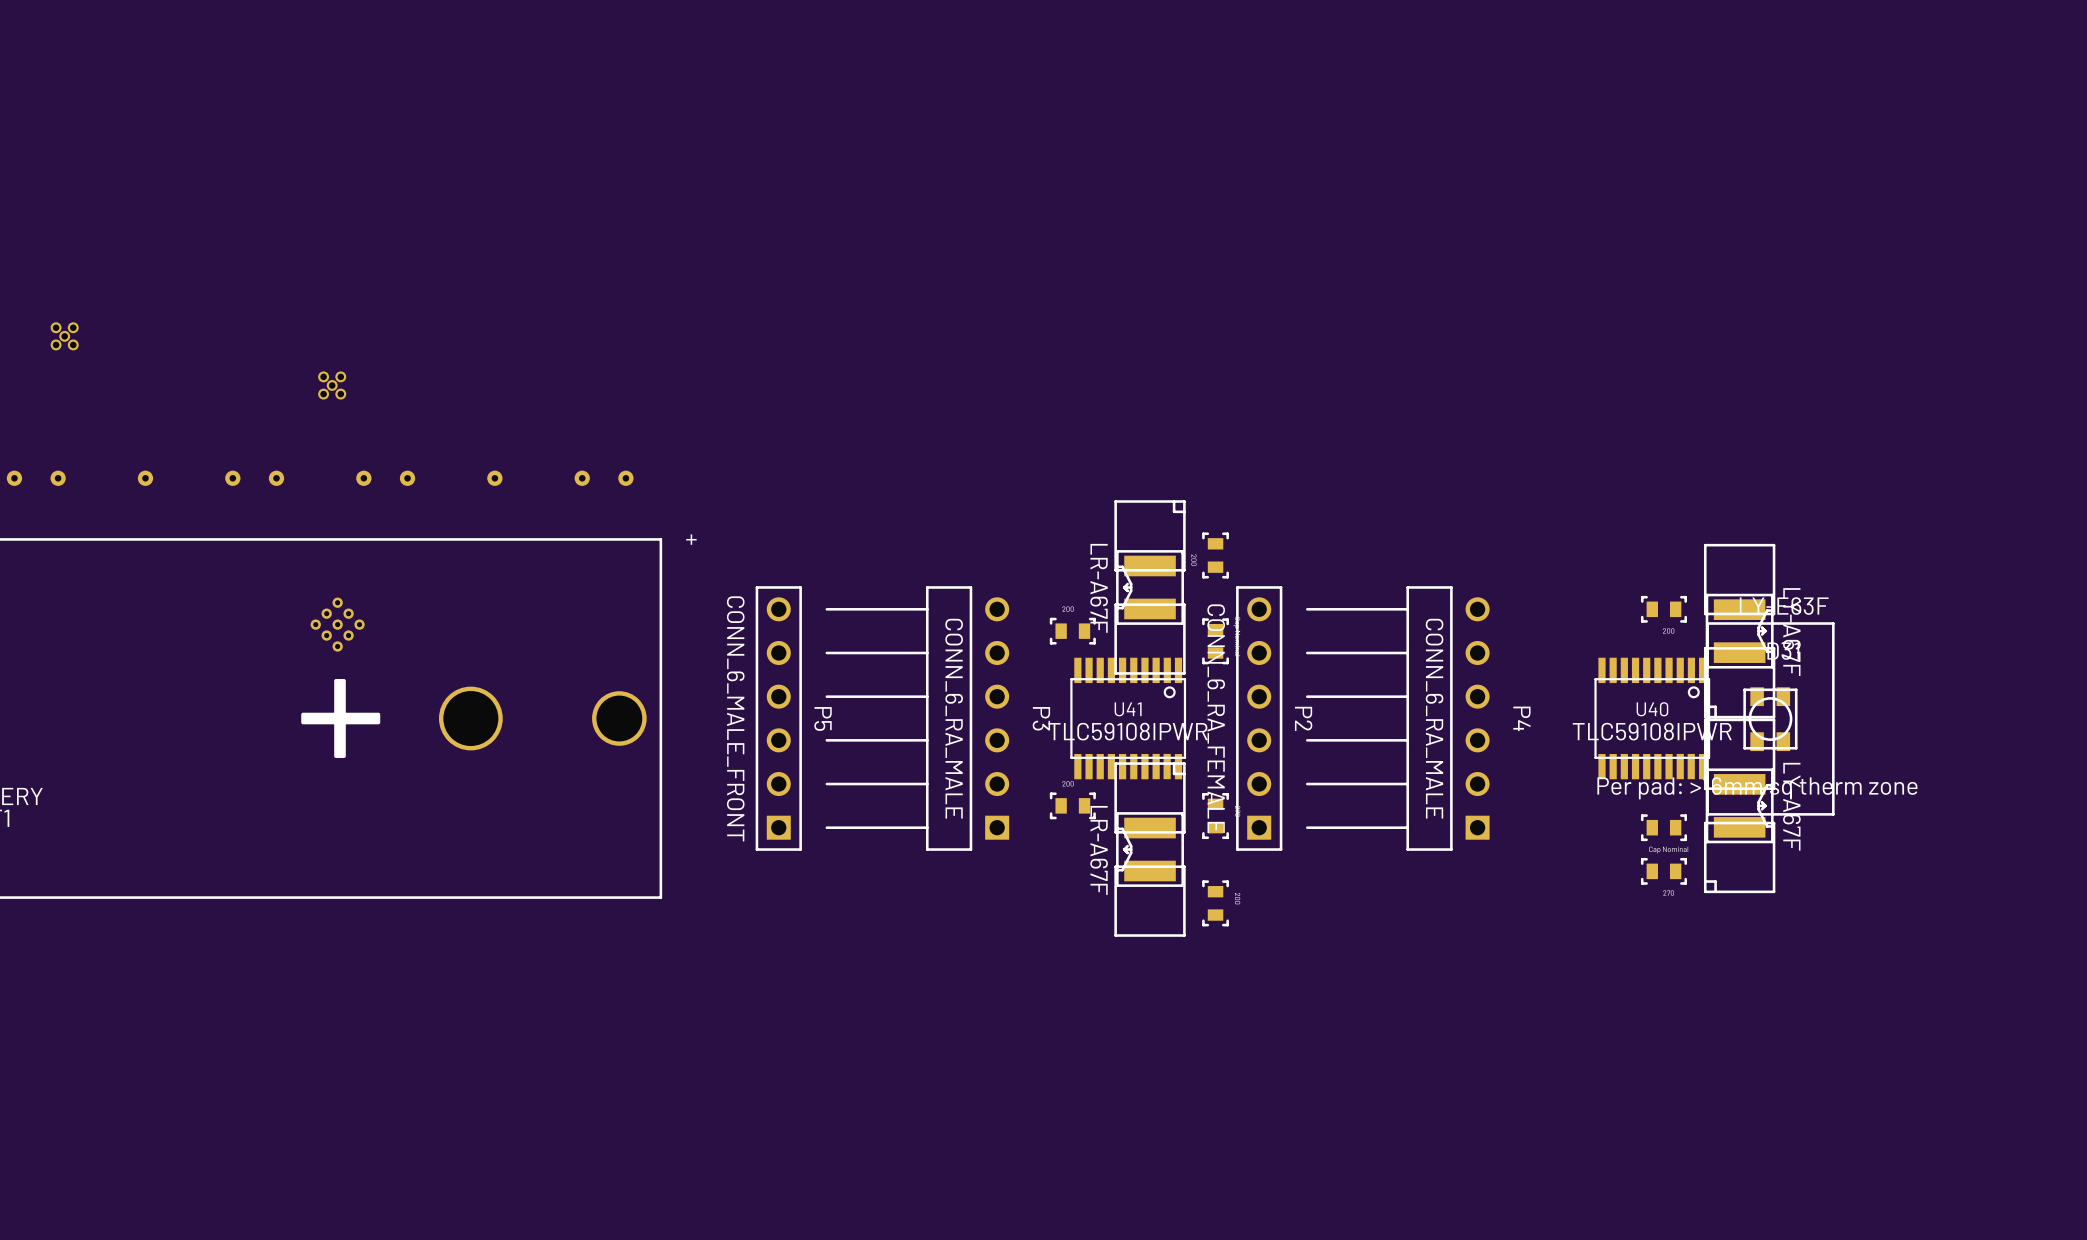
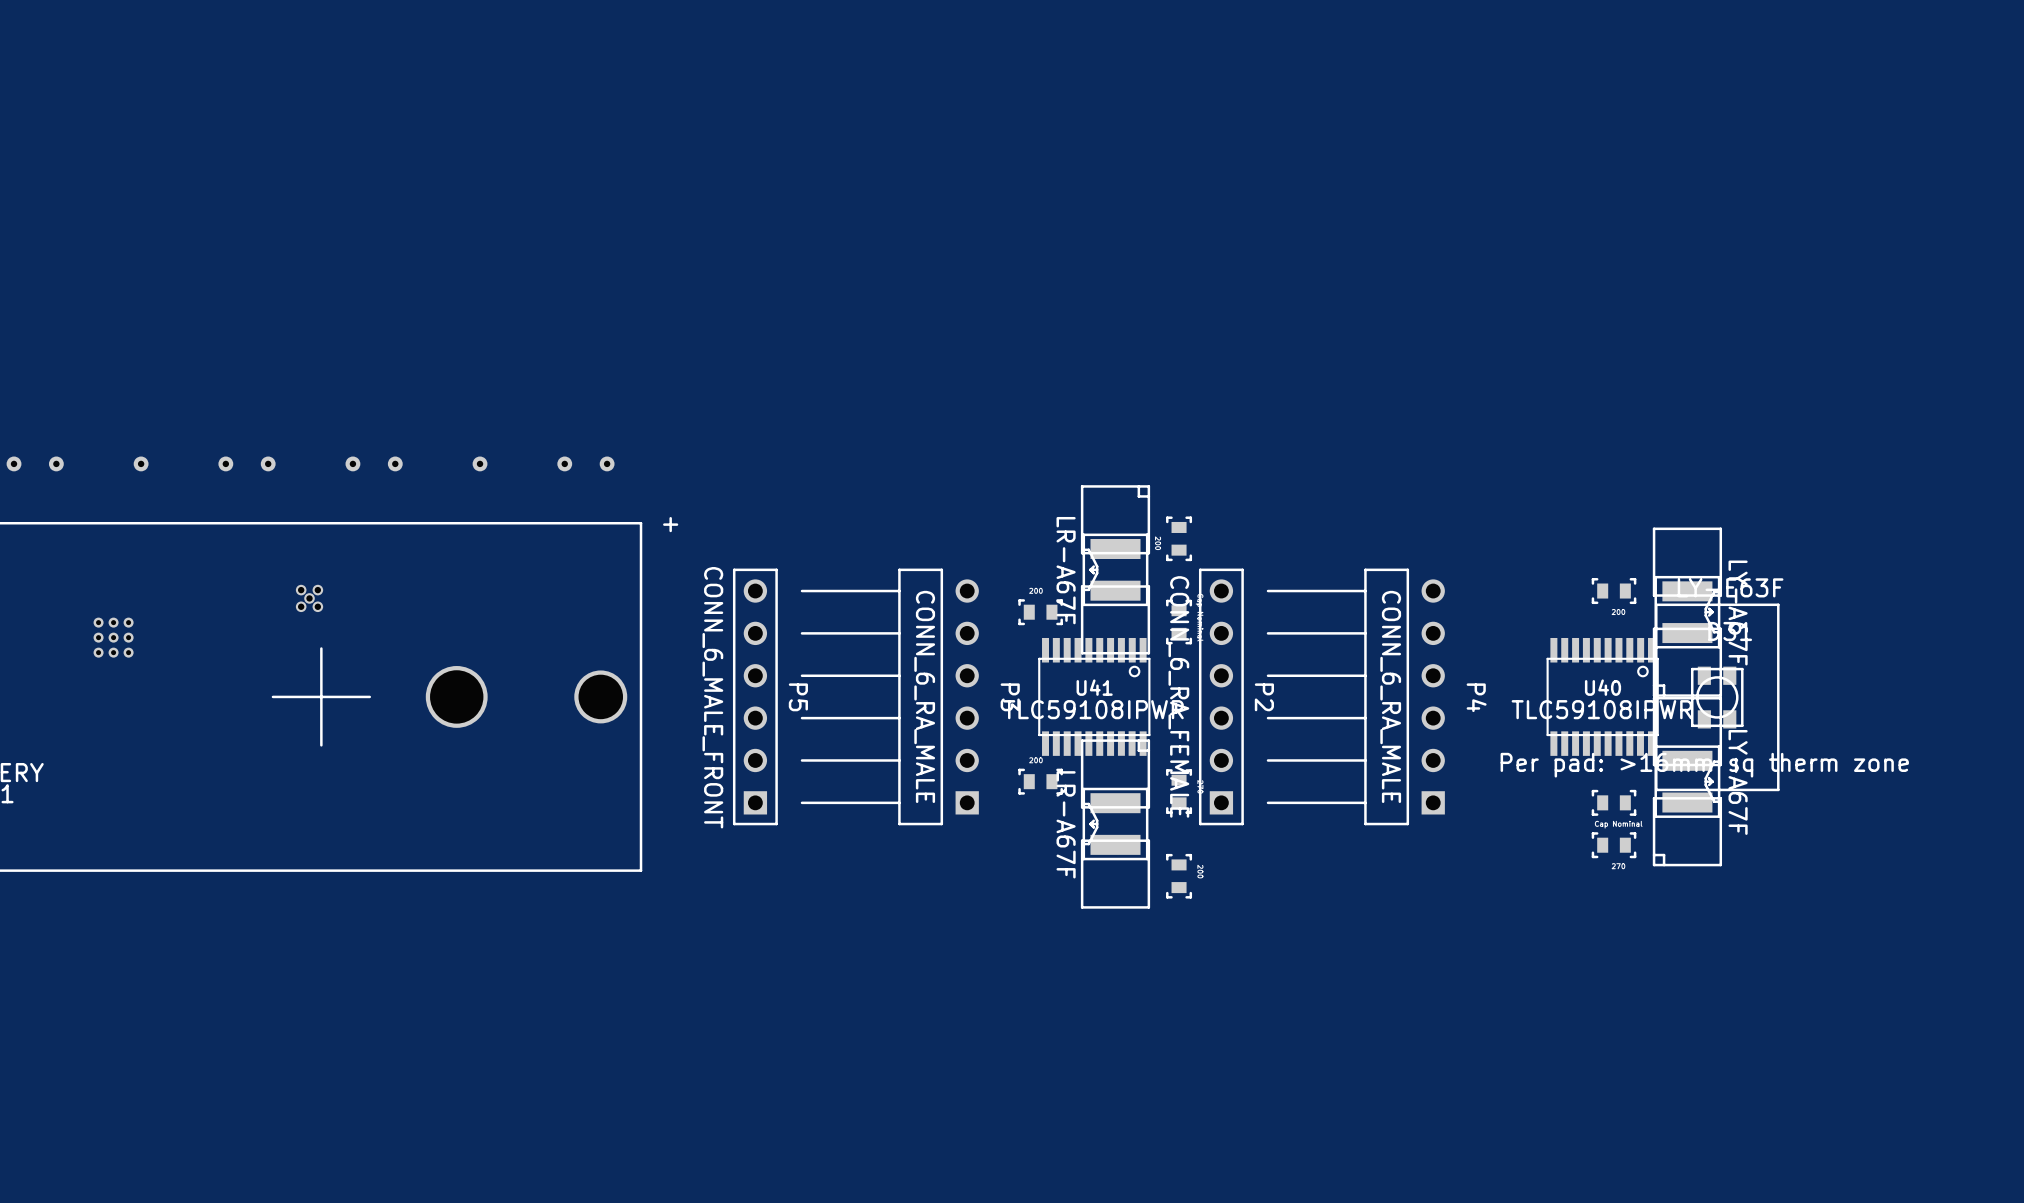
part: (64, 336) -> none
part: (332, 385) -> none
part: none -> (309, 598)
part: (337, 624) -> none
part: none -> (113, 637)

